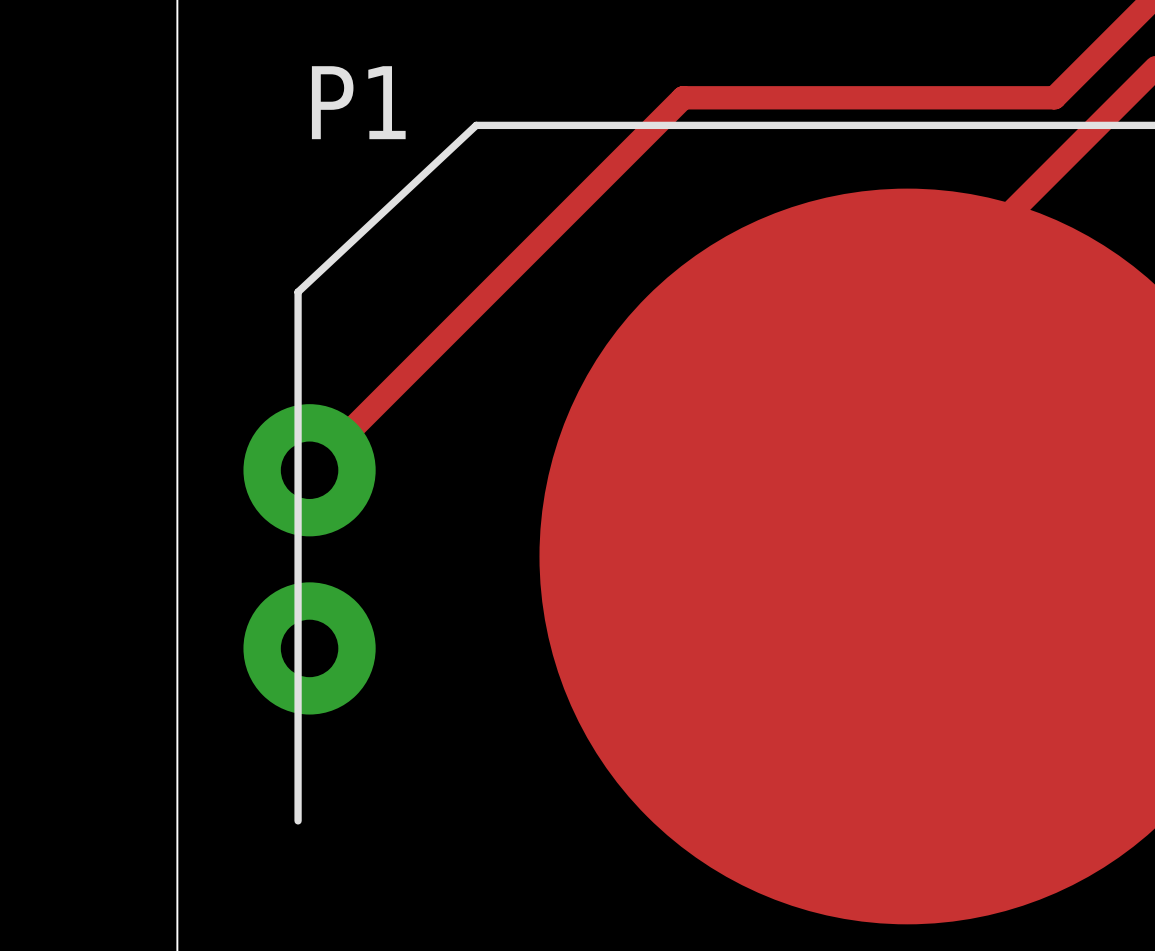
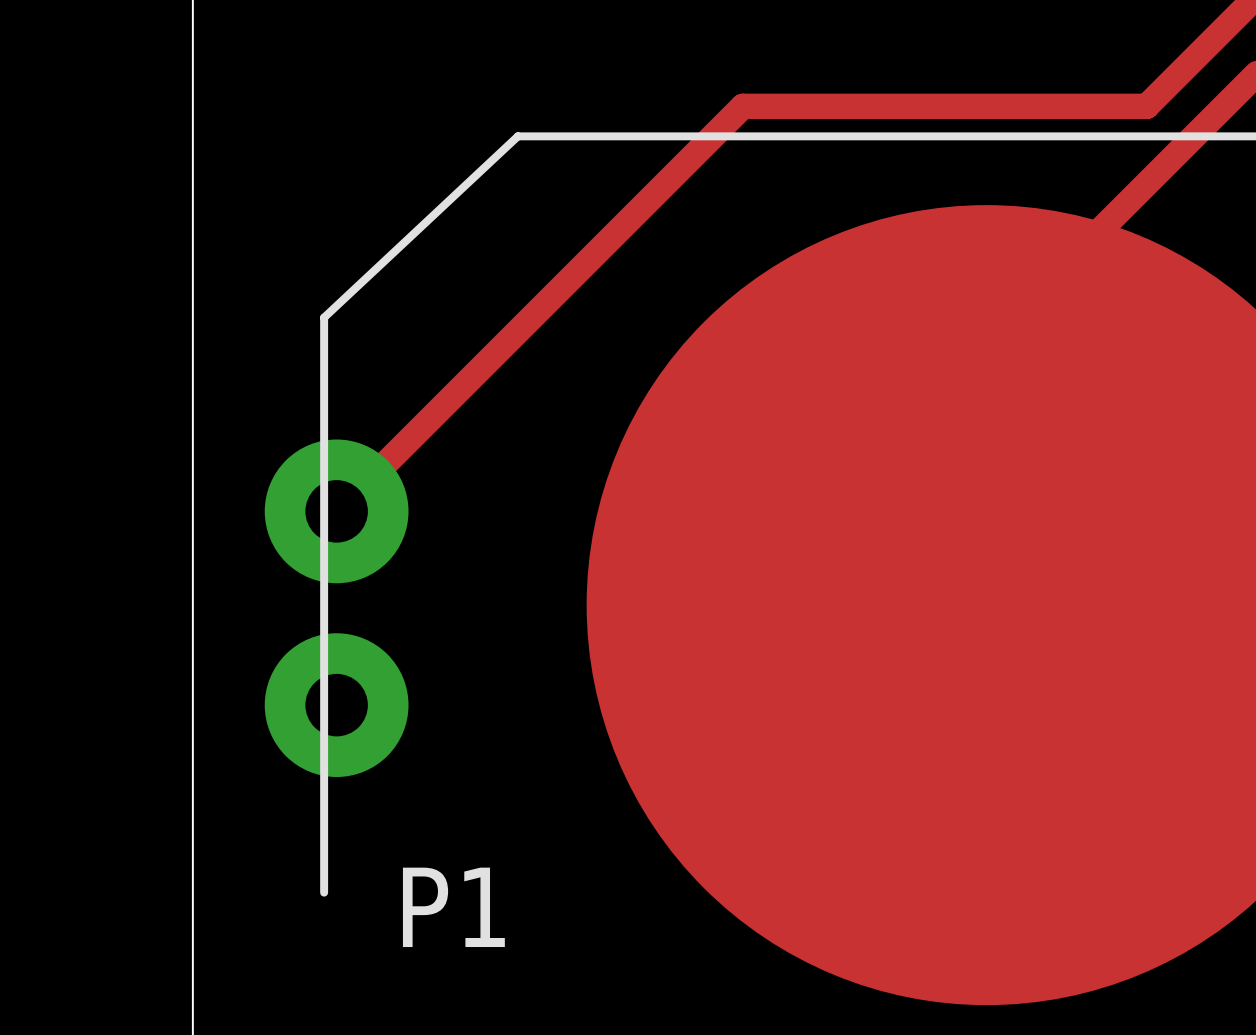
P1 name position: P1 (358, 102) -> P1 (453, 907)

